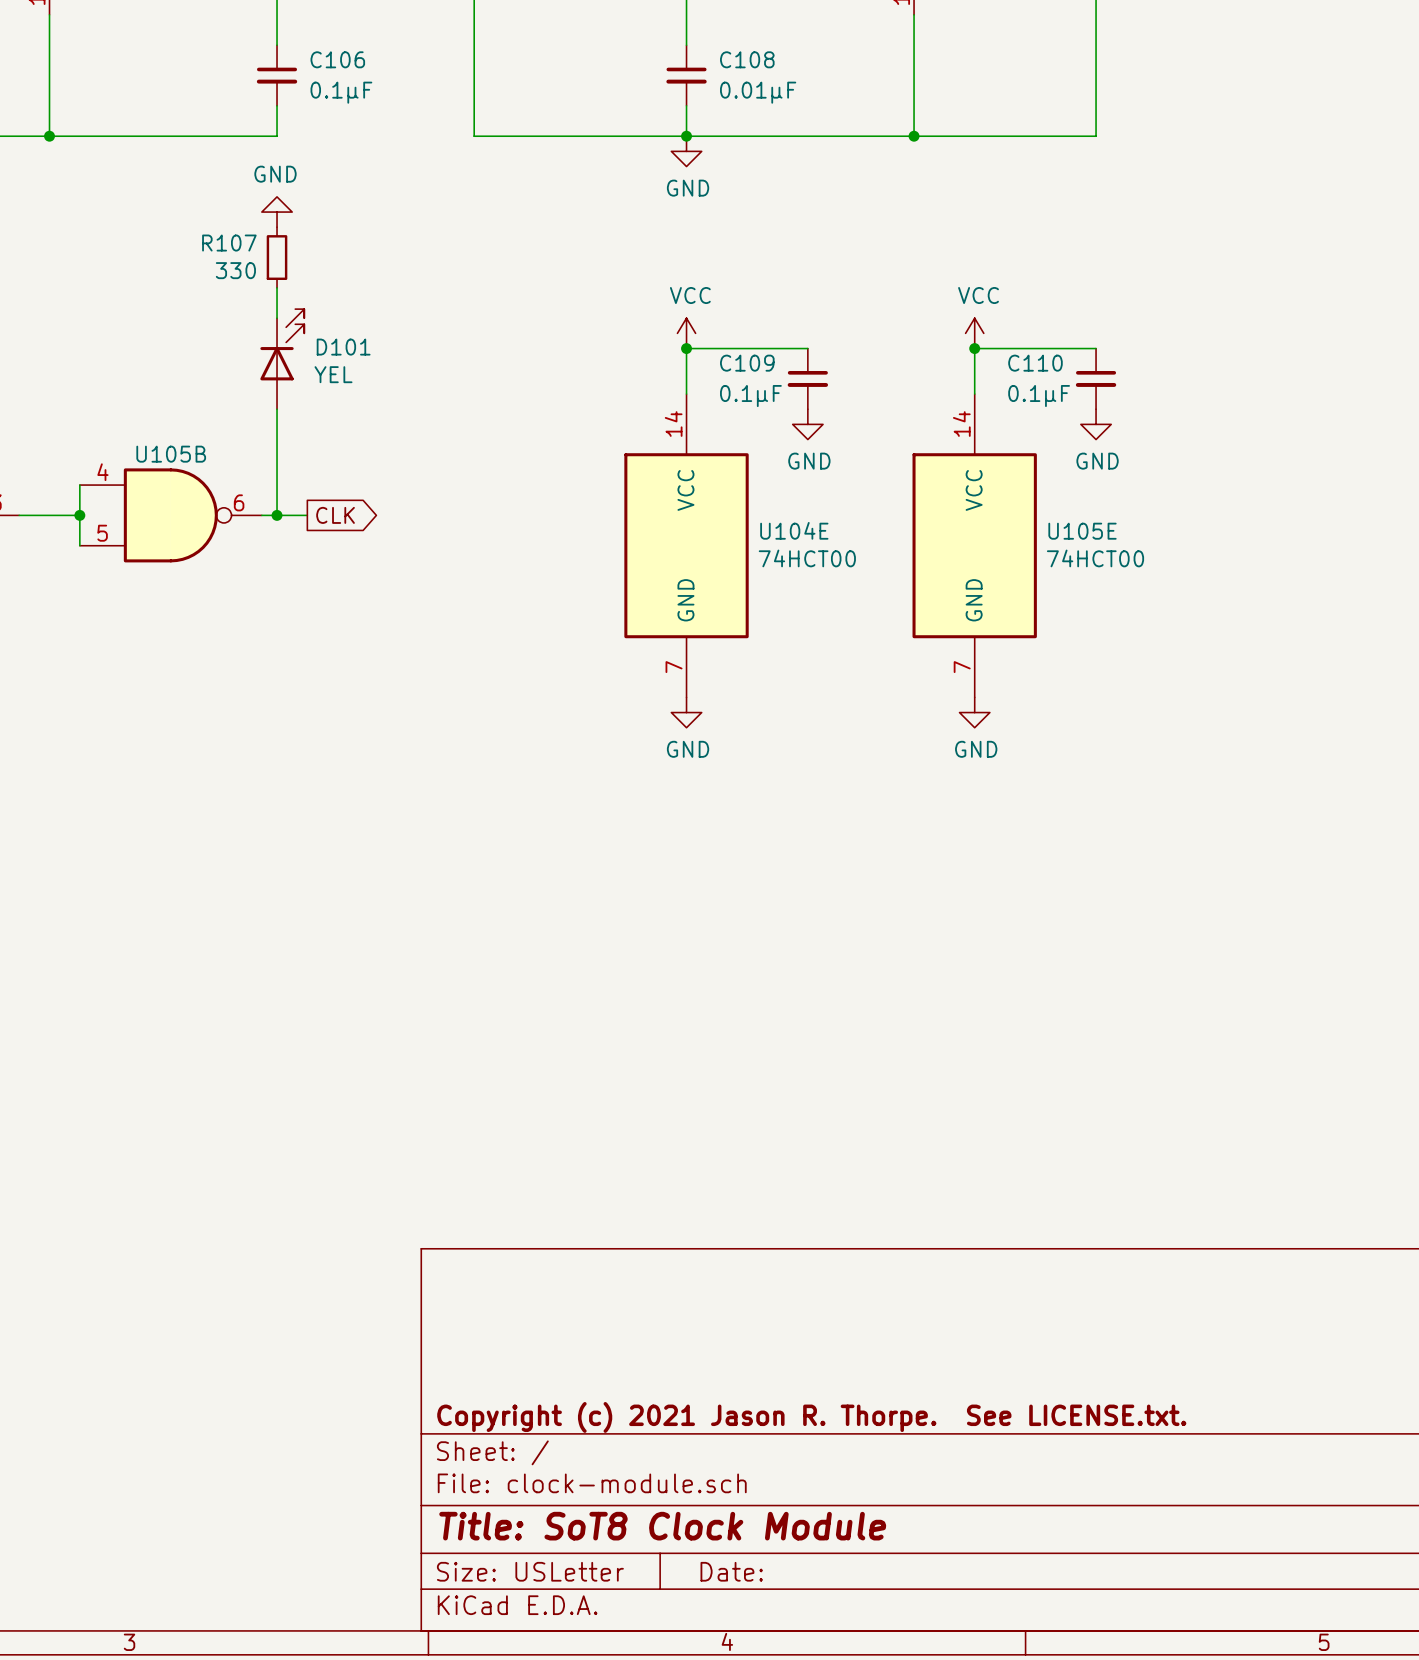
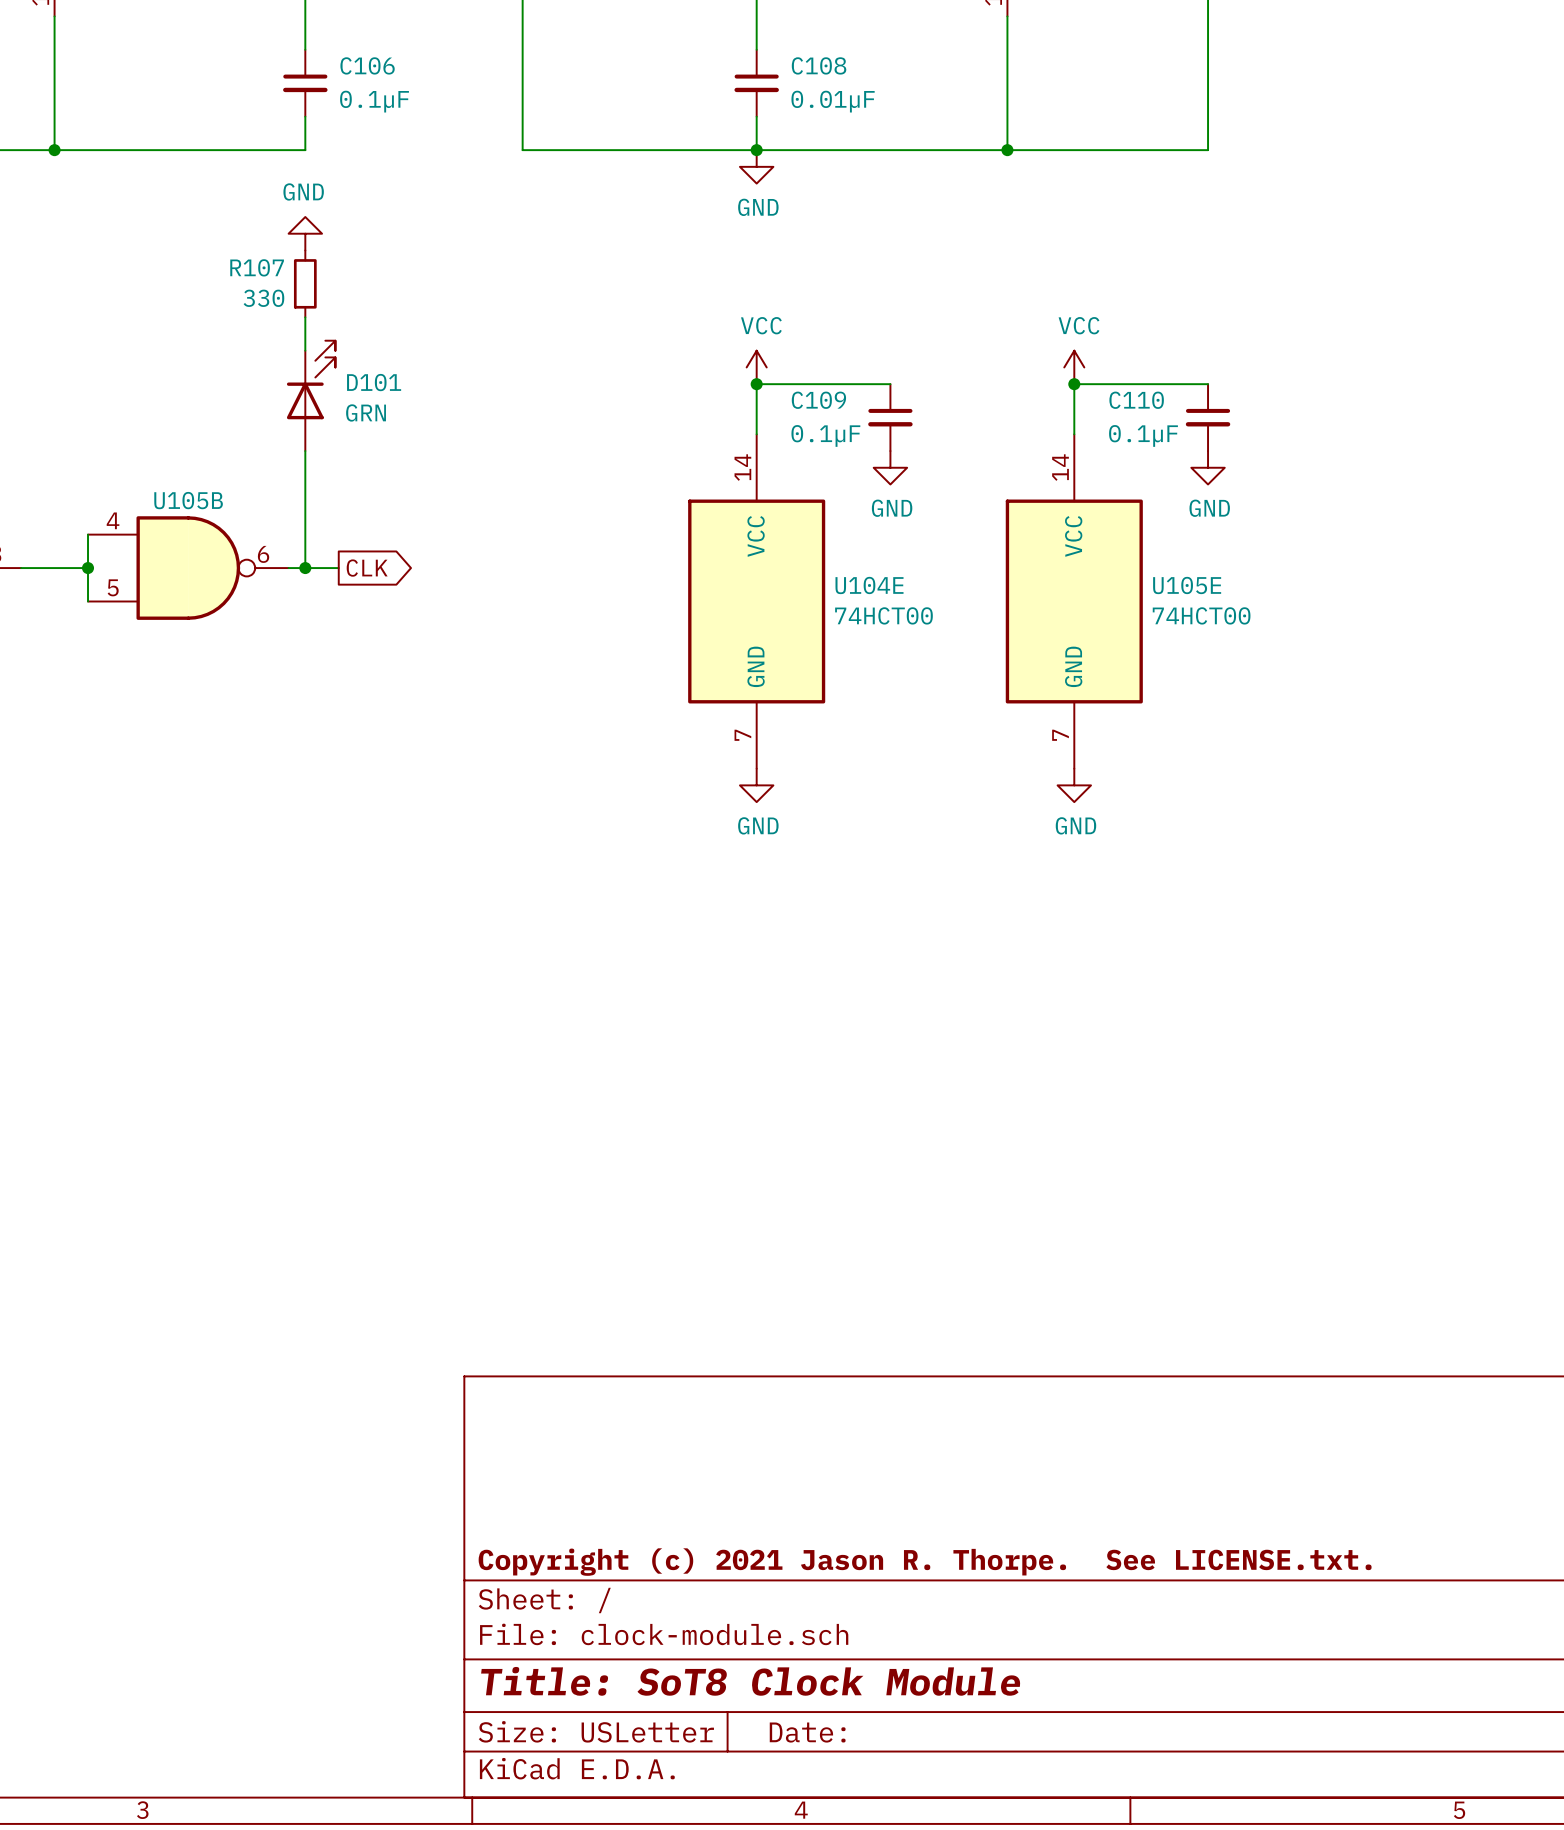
D101 value: YEL (333, 374) -> GRN (366, 412)

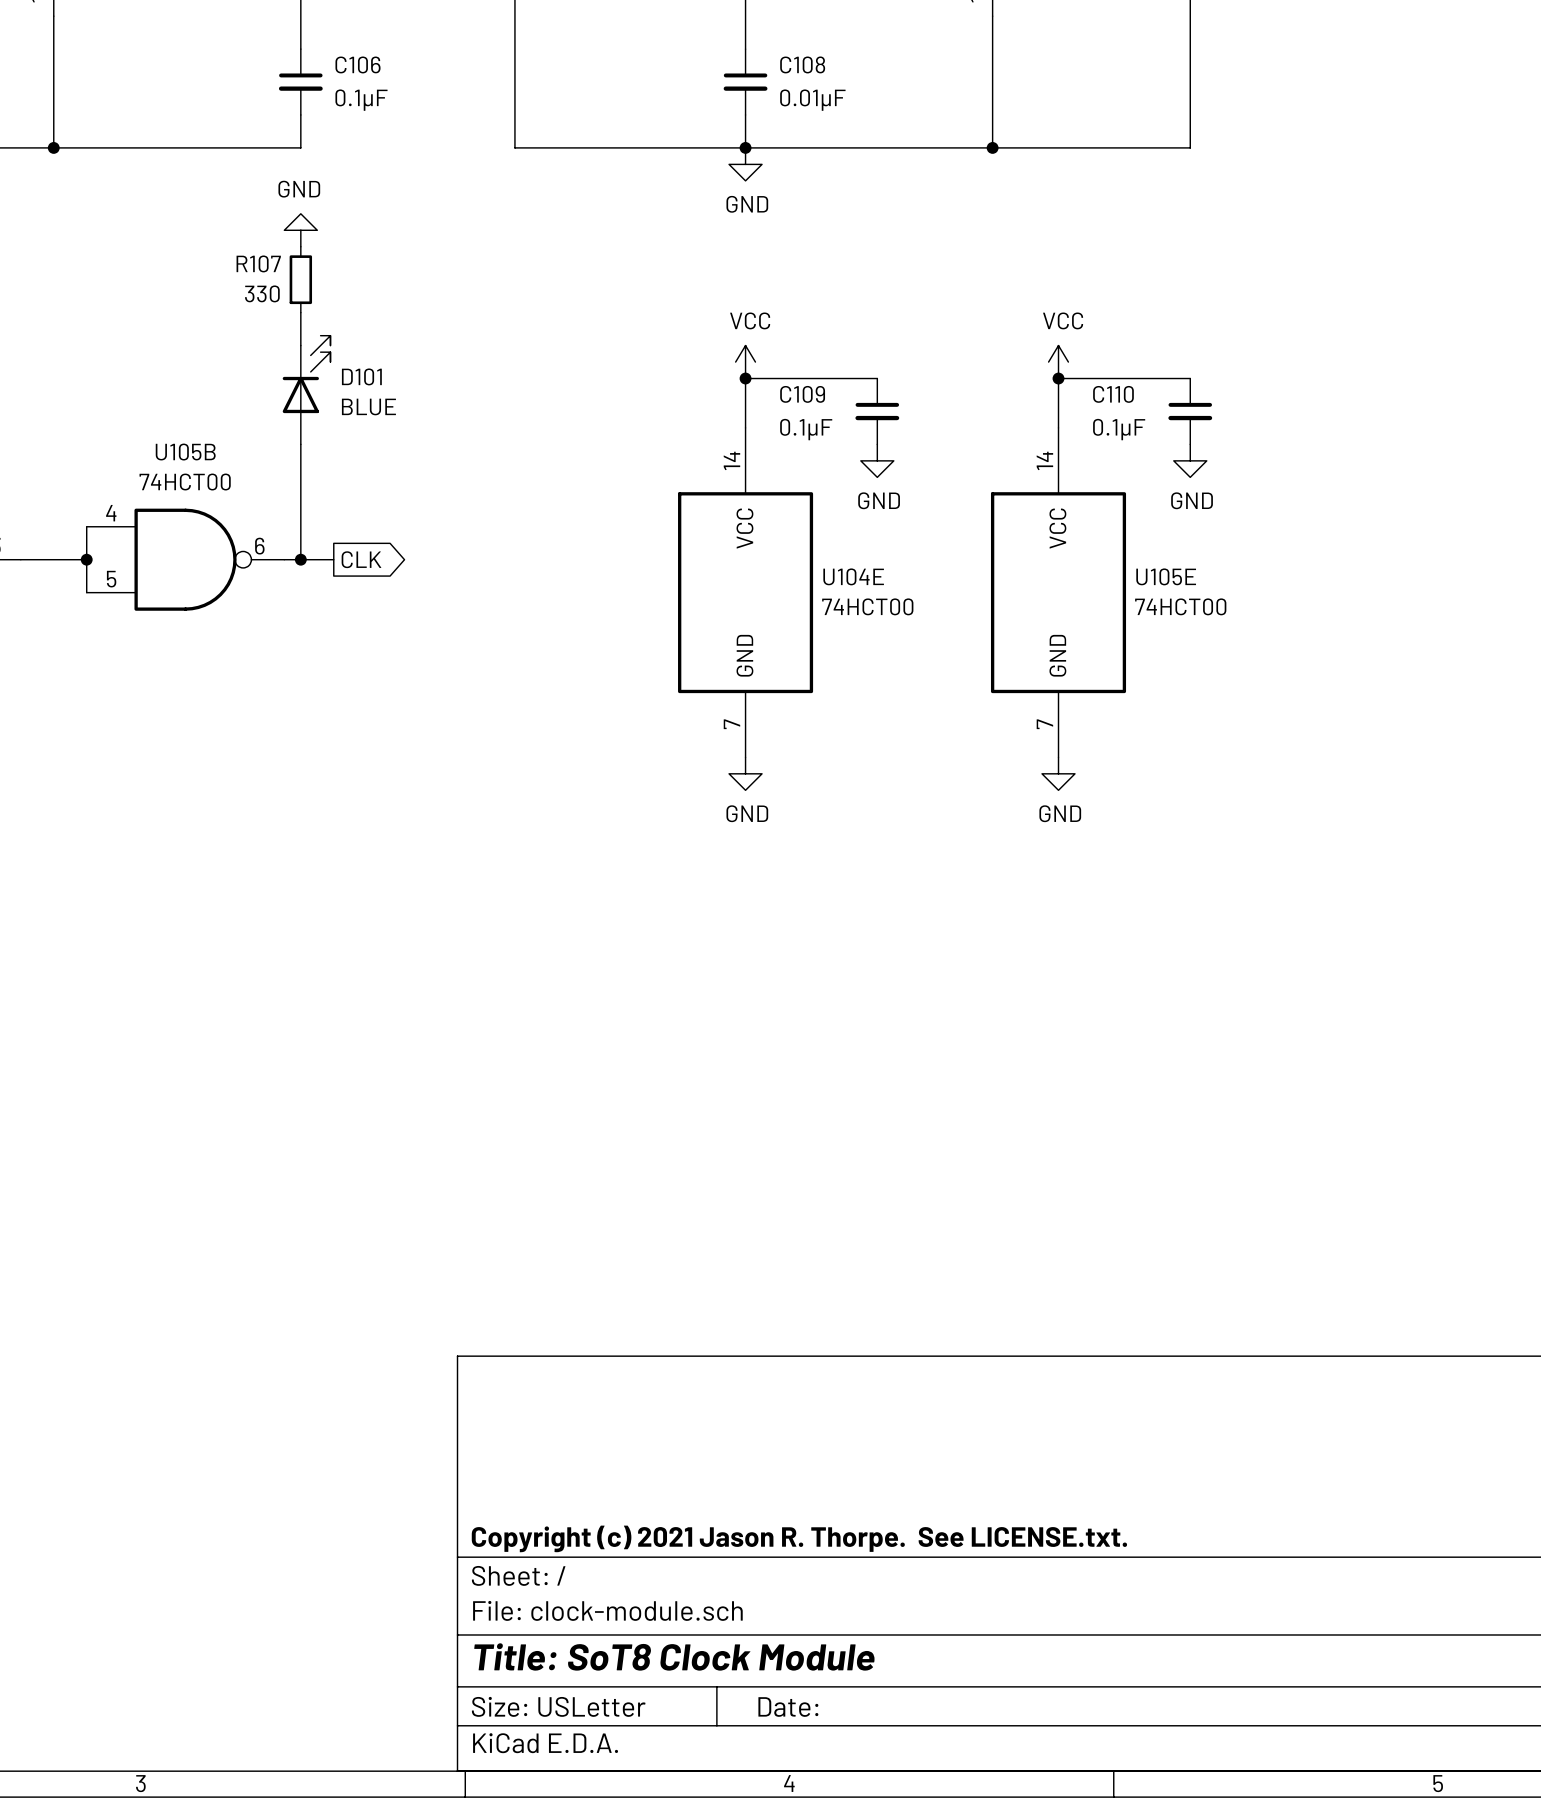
D101 value: GRN (366, 412) -> BLUE (368, 406)
U105B value: none -> 74HCT00 (185, 482)
U105B name position: U105B (188, 500) -> U105B (185, 452)

